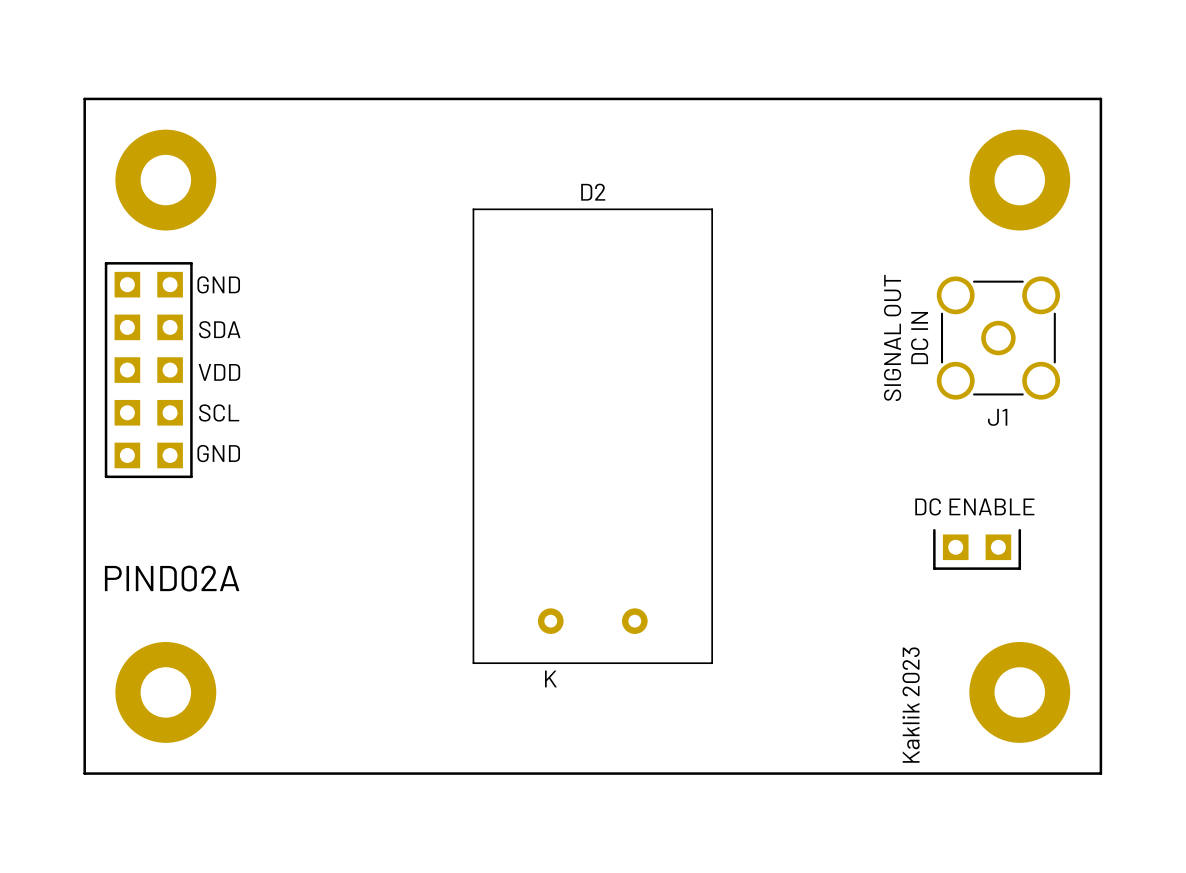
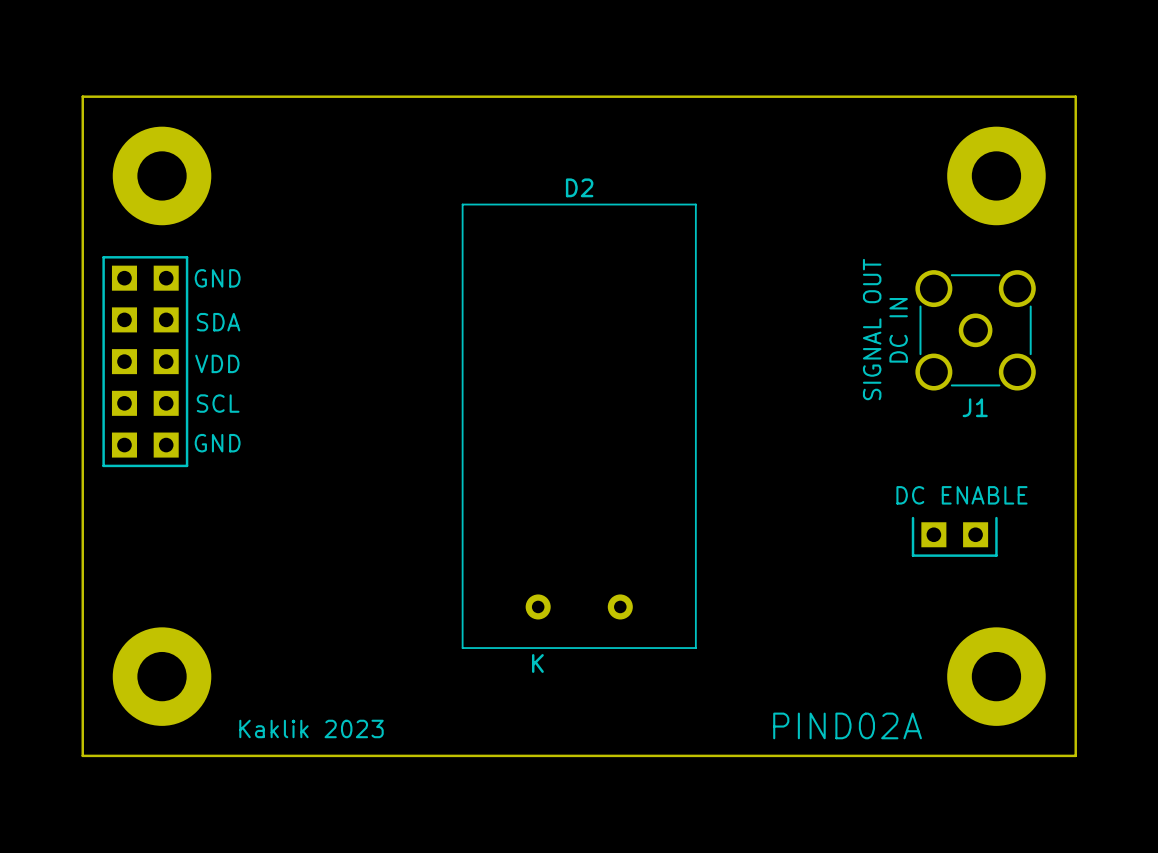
text: PIND02A (172, 578) -> none
text: Kaklik 2023 (911, 705) -> none
text: none -> PIND02A (847, 725)
text: none -> Kaklik 2023 (311, 728)

